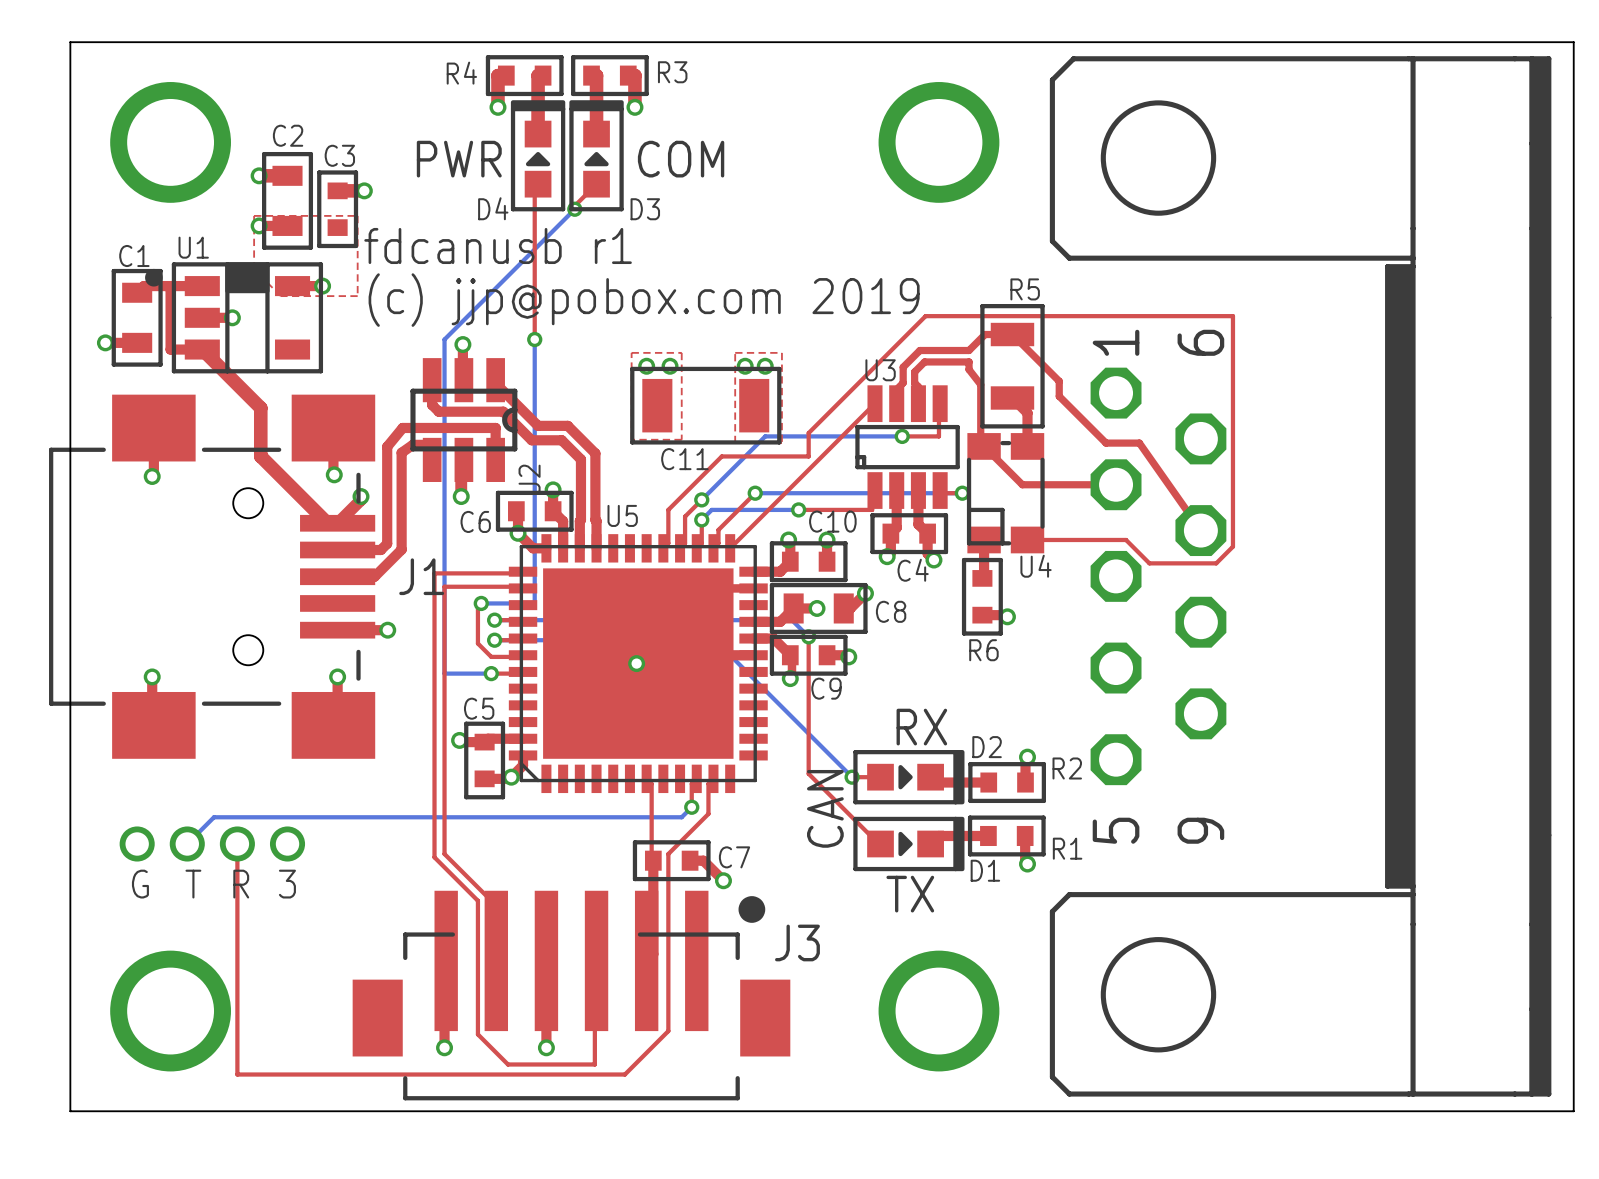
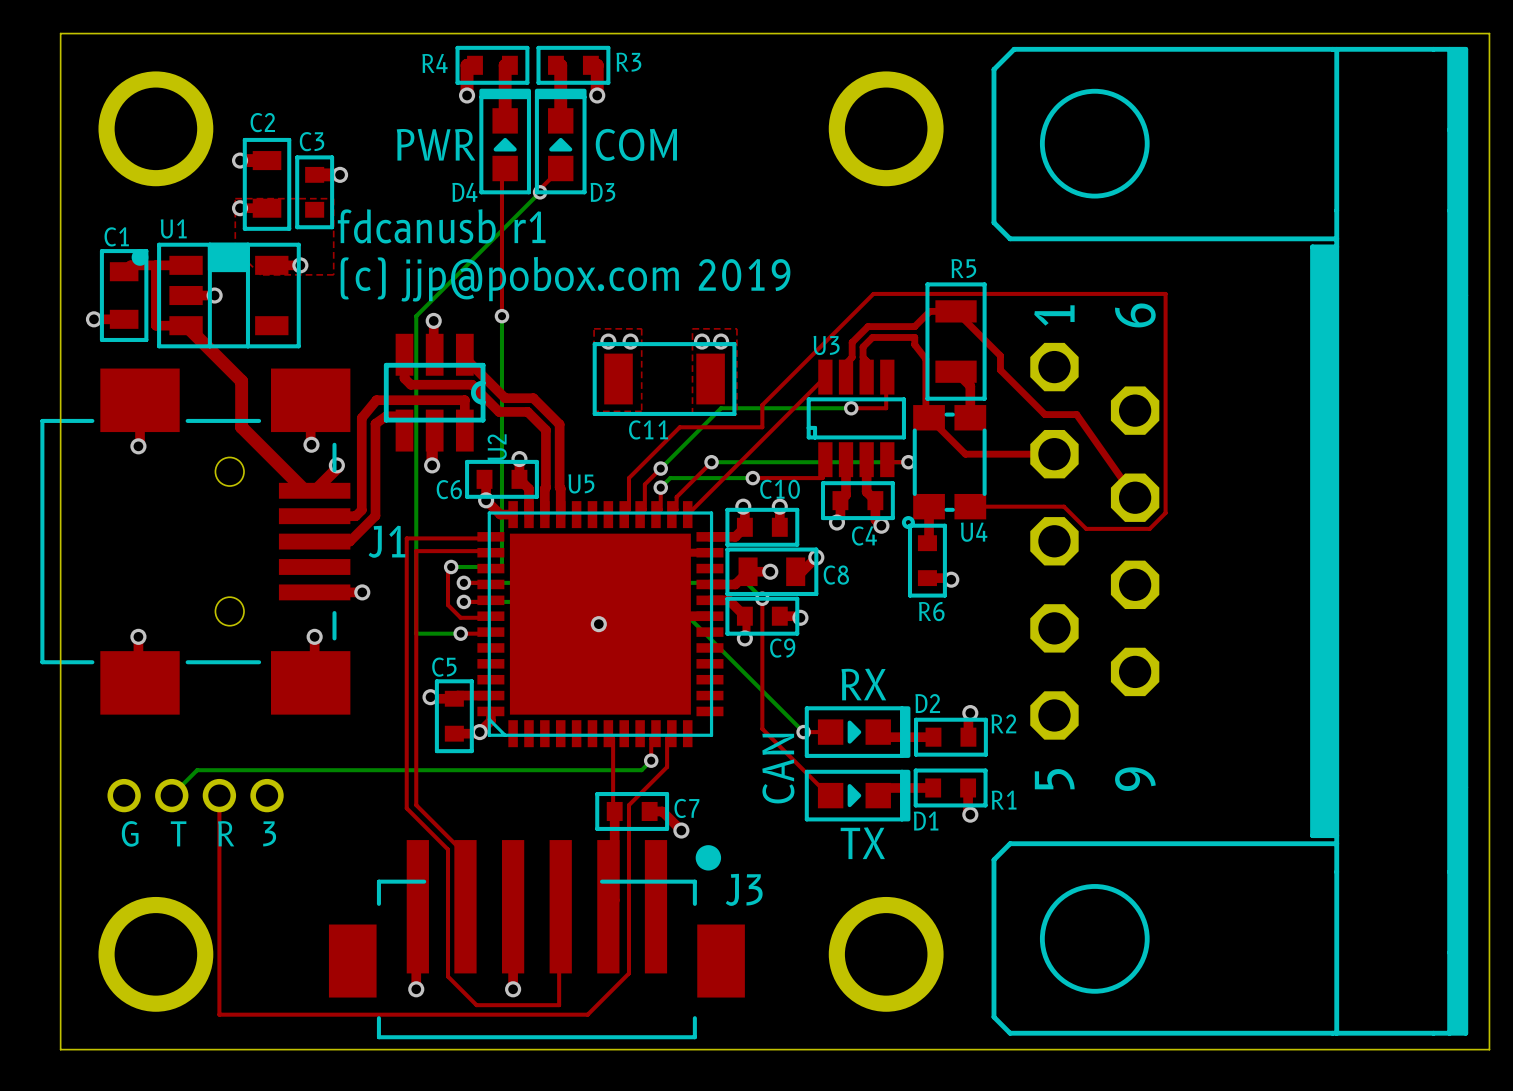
U4 footprint: [966, 433, 1045, 554] -> [901, 405, 987, 530]

